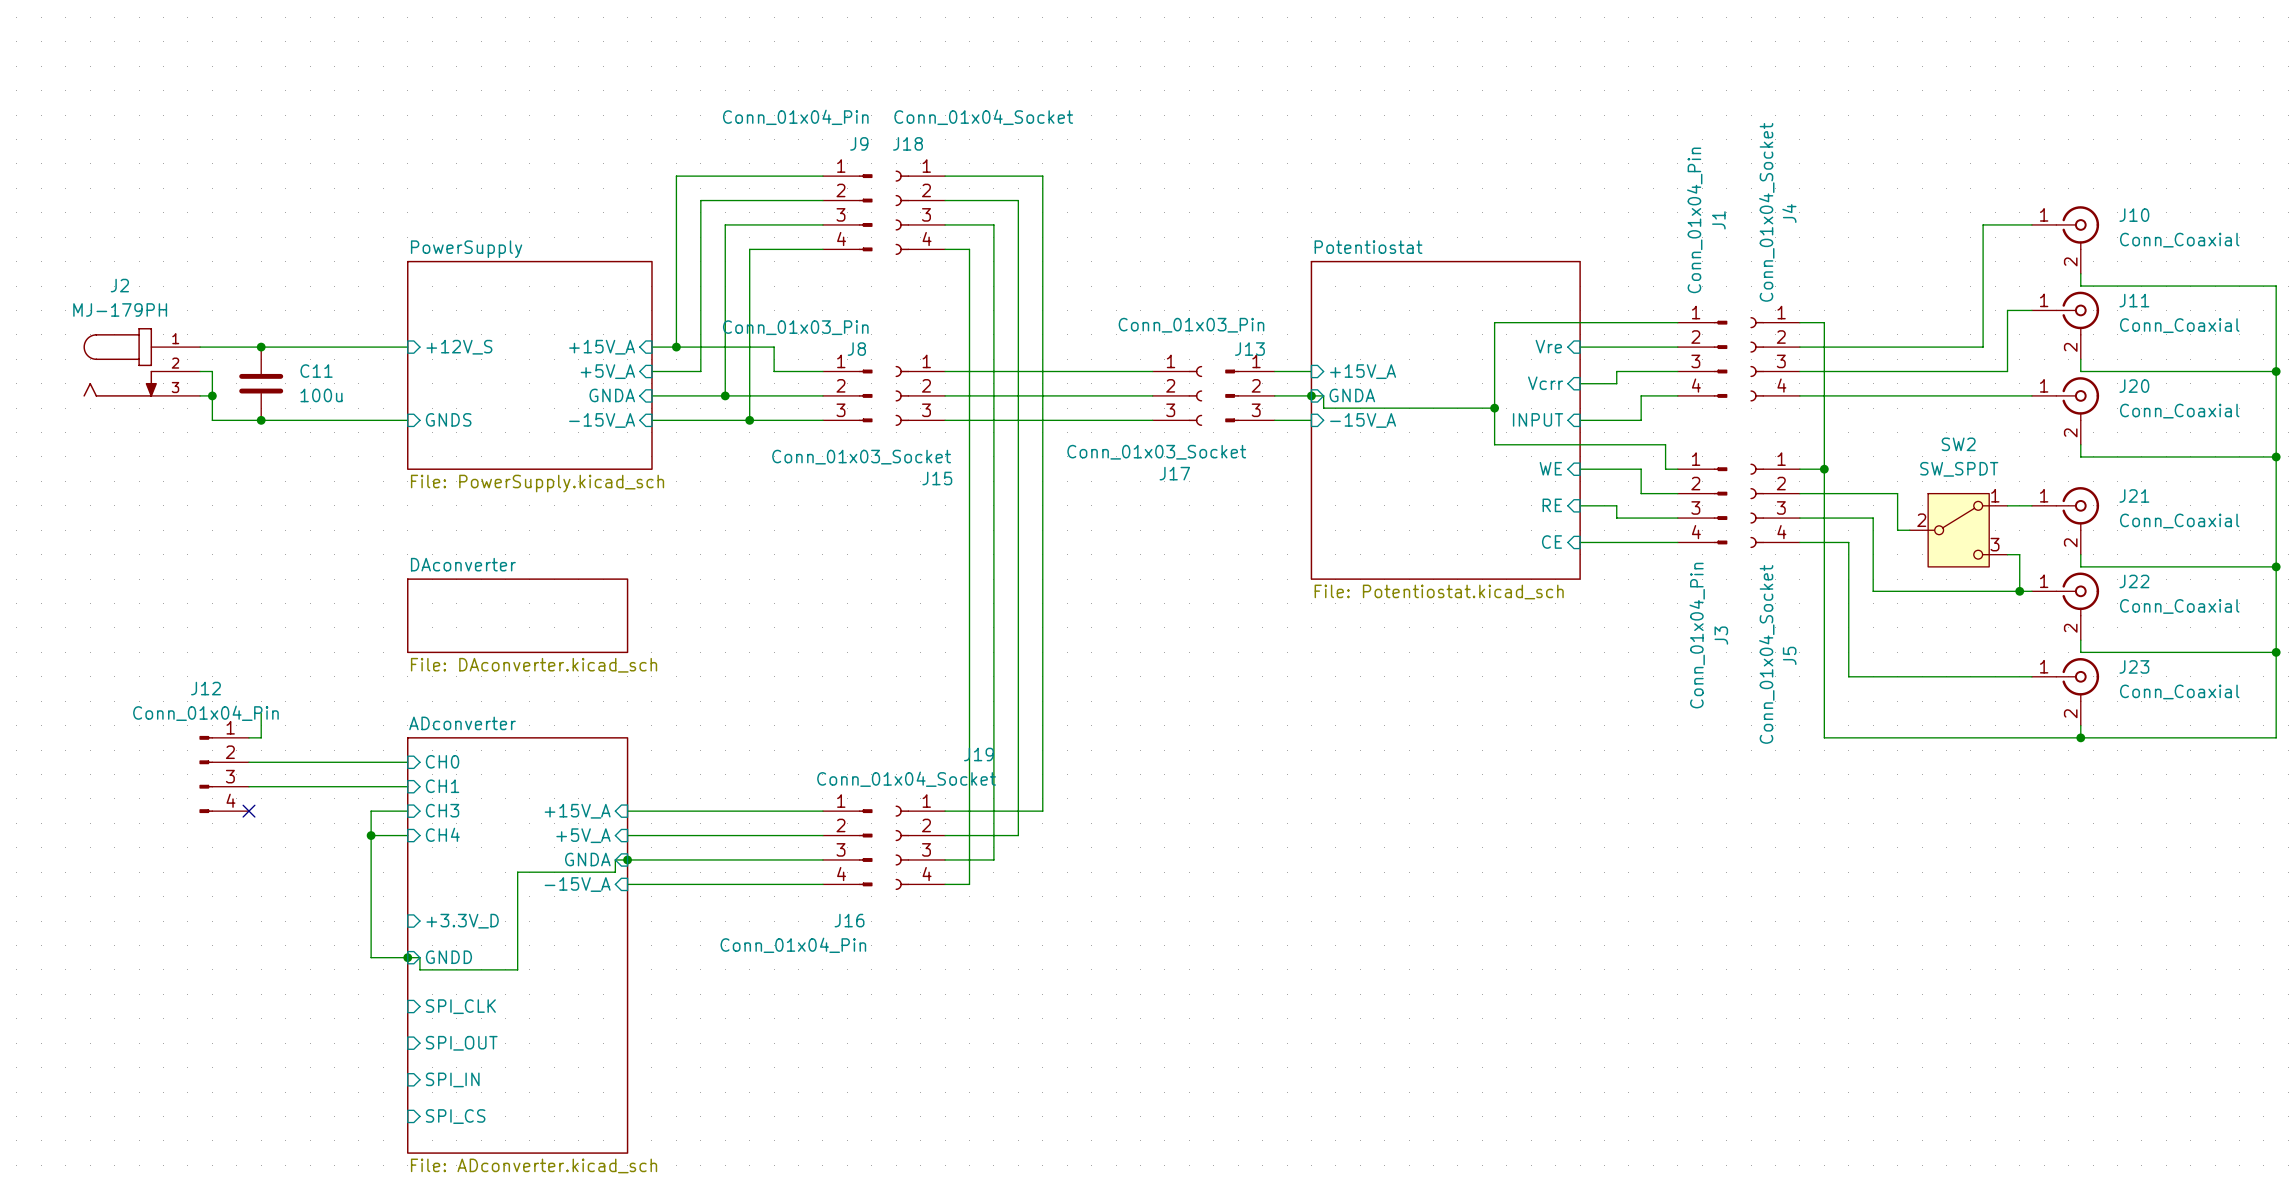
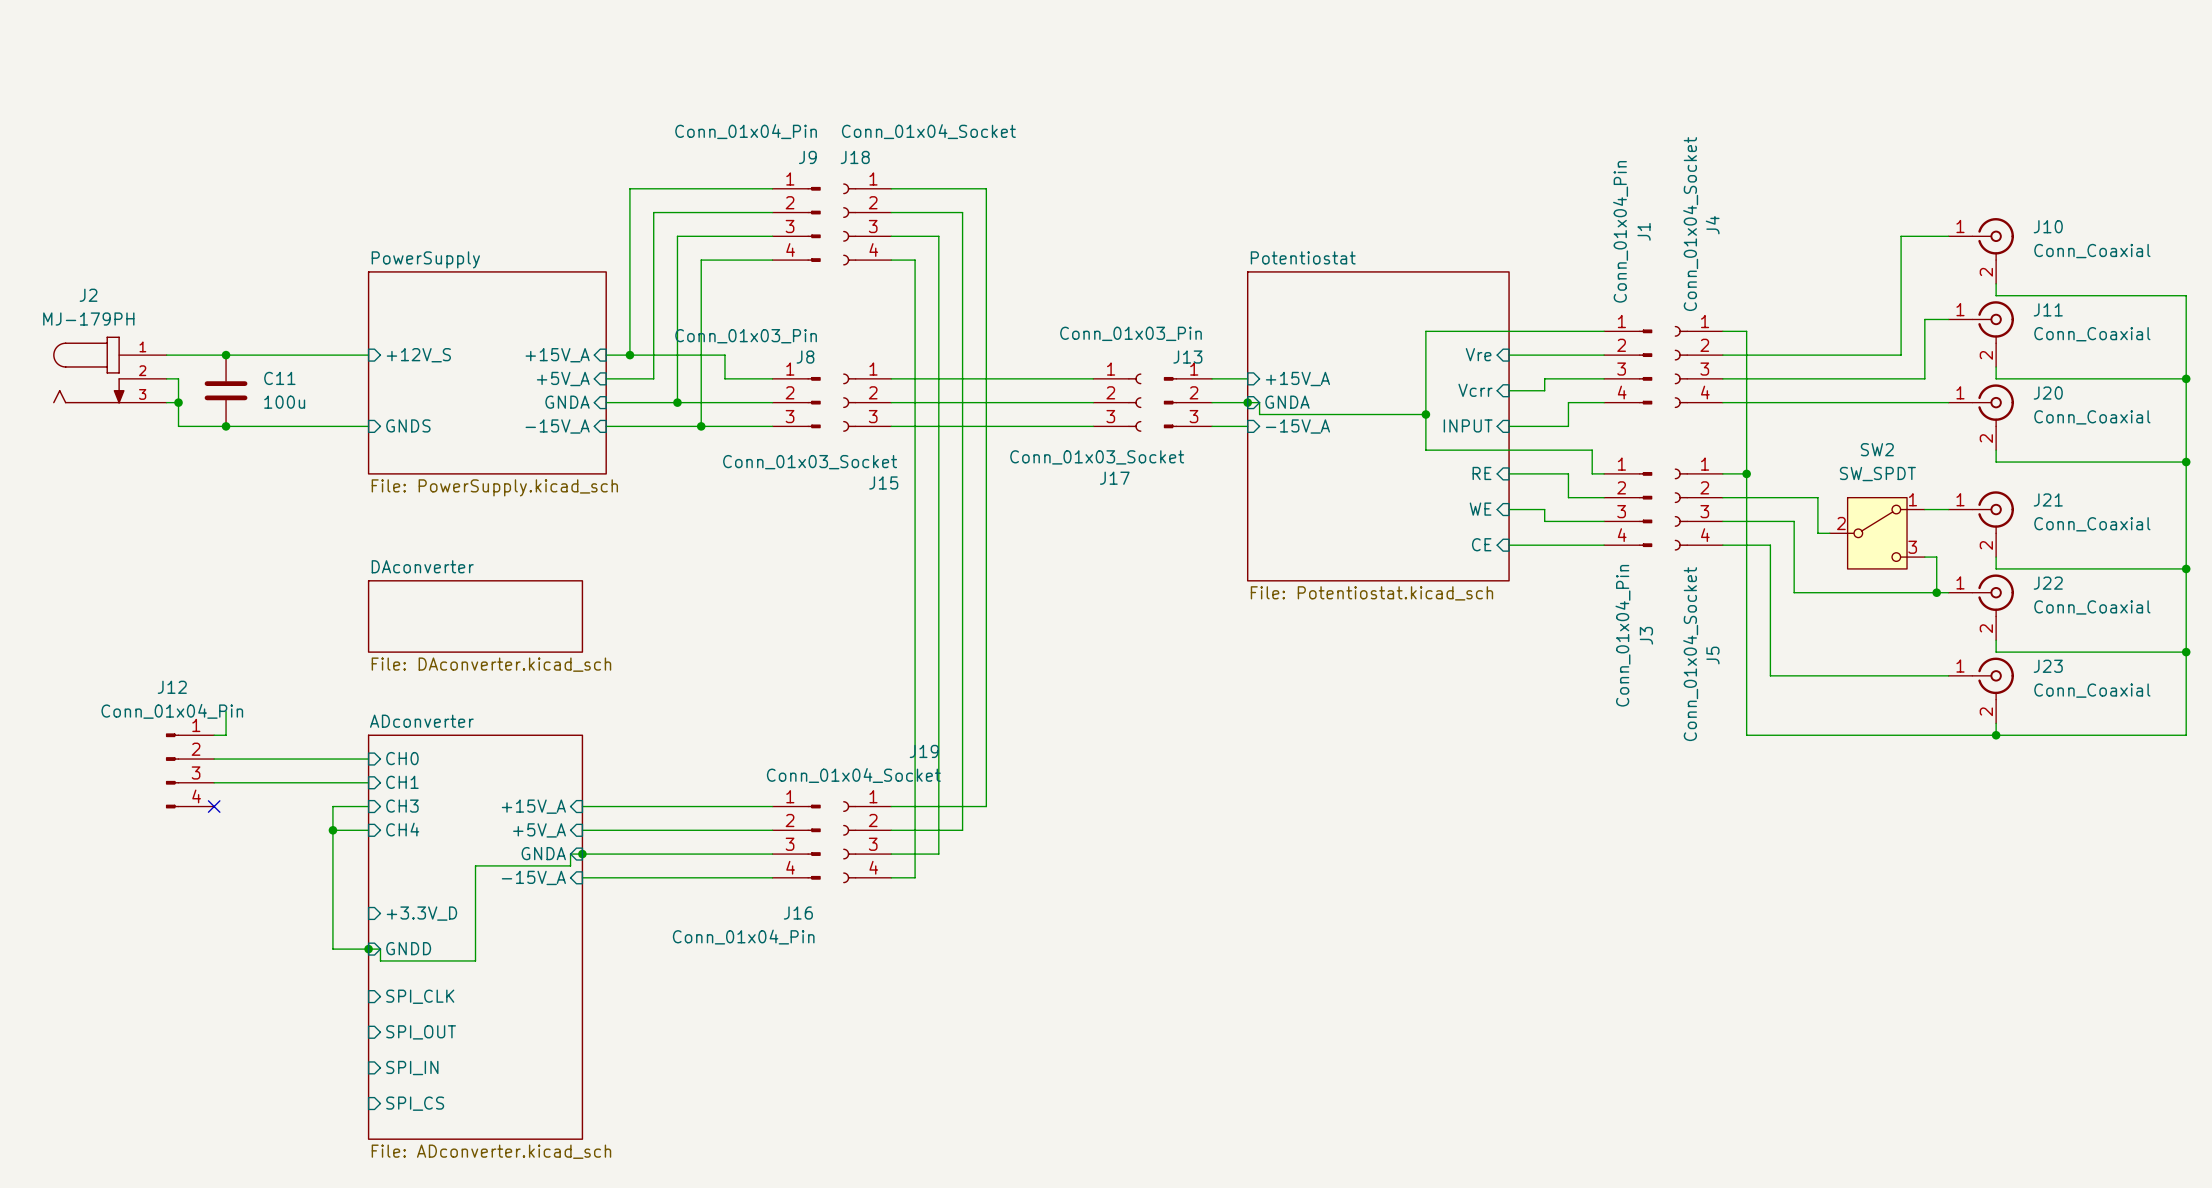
sheet pin: WE (1550, 468) -> RE (1481, 473)
sheet pin: RE (1552, 505) -> WE (1480, 509)

